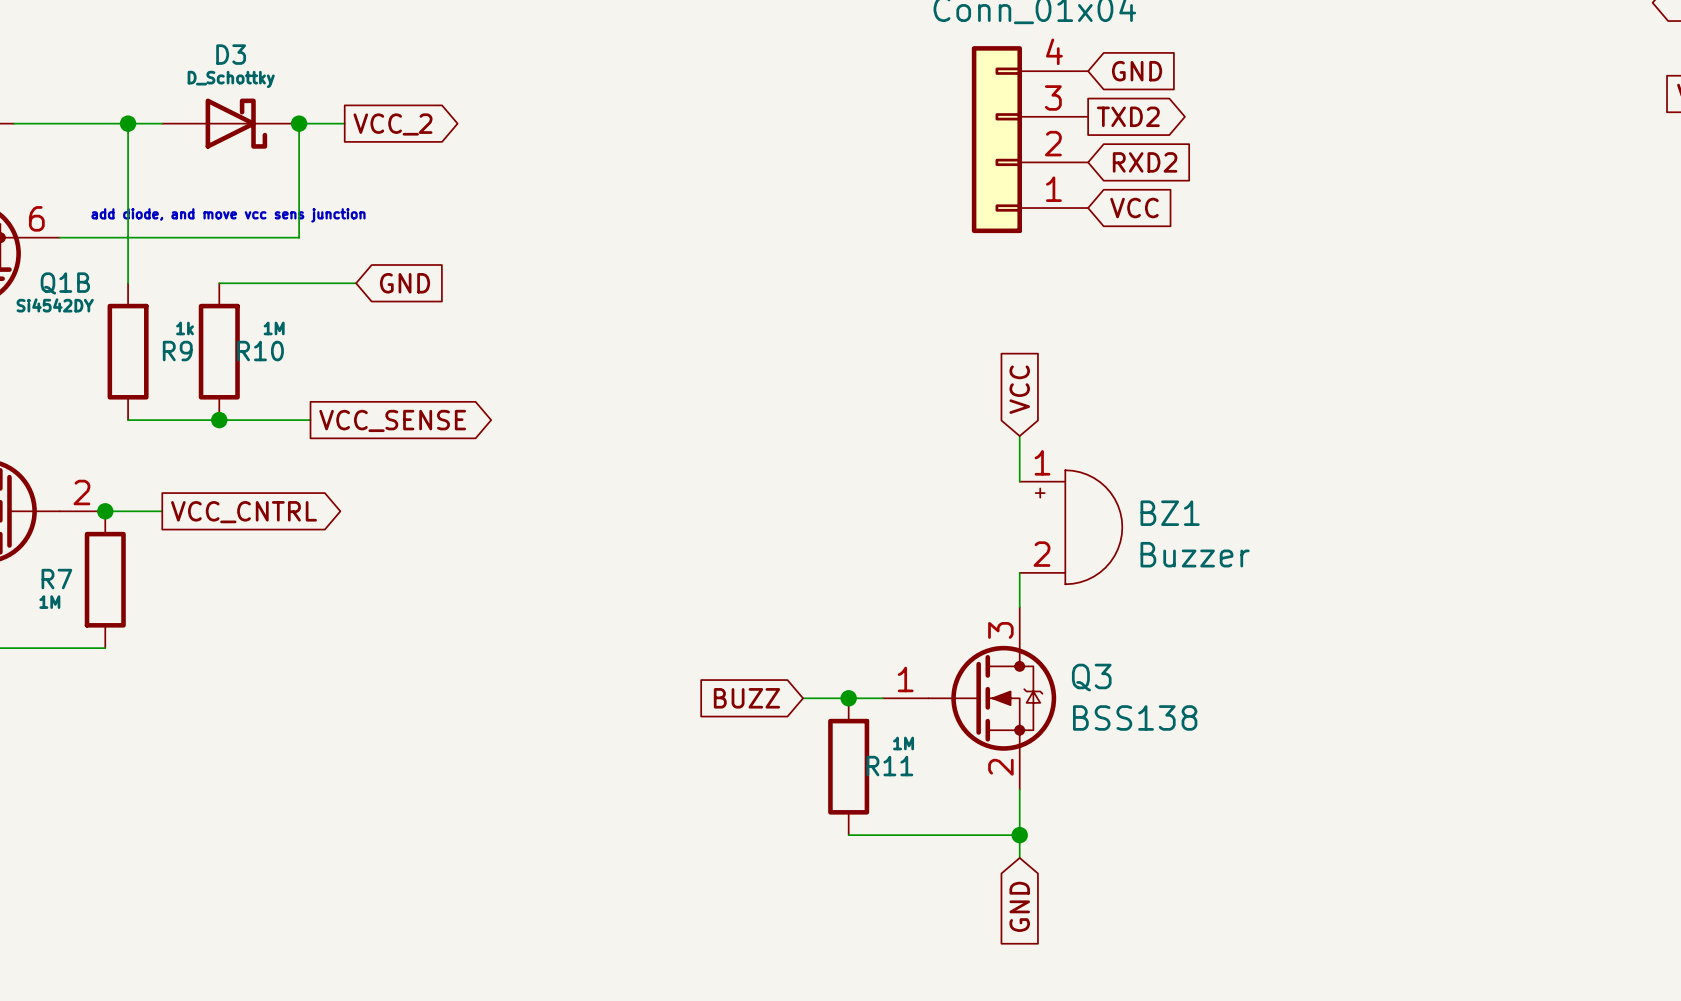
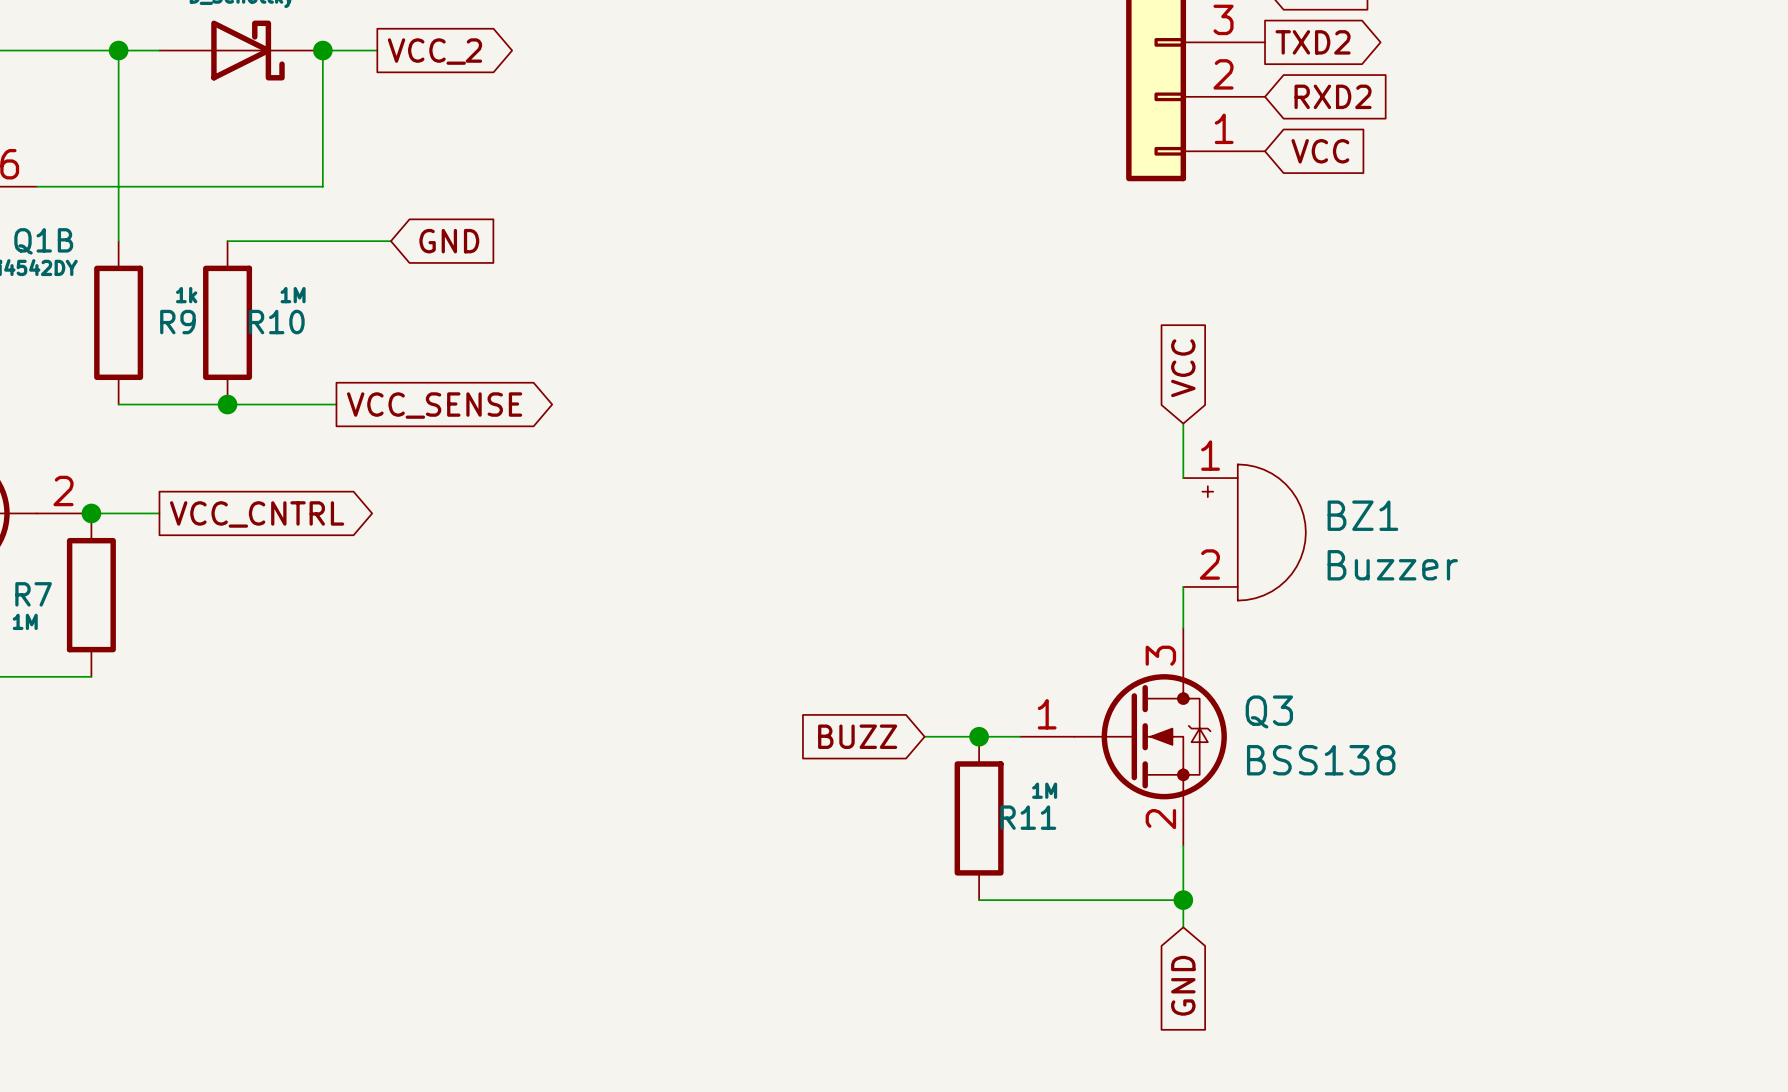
text: add diode, and move vcc sens junction (228, 215) -> none

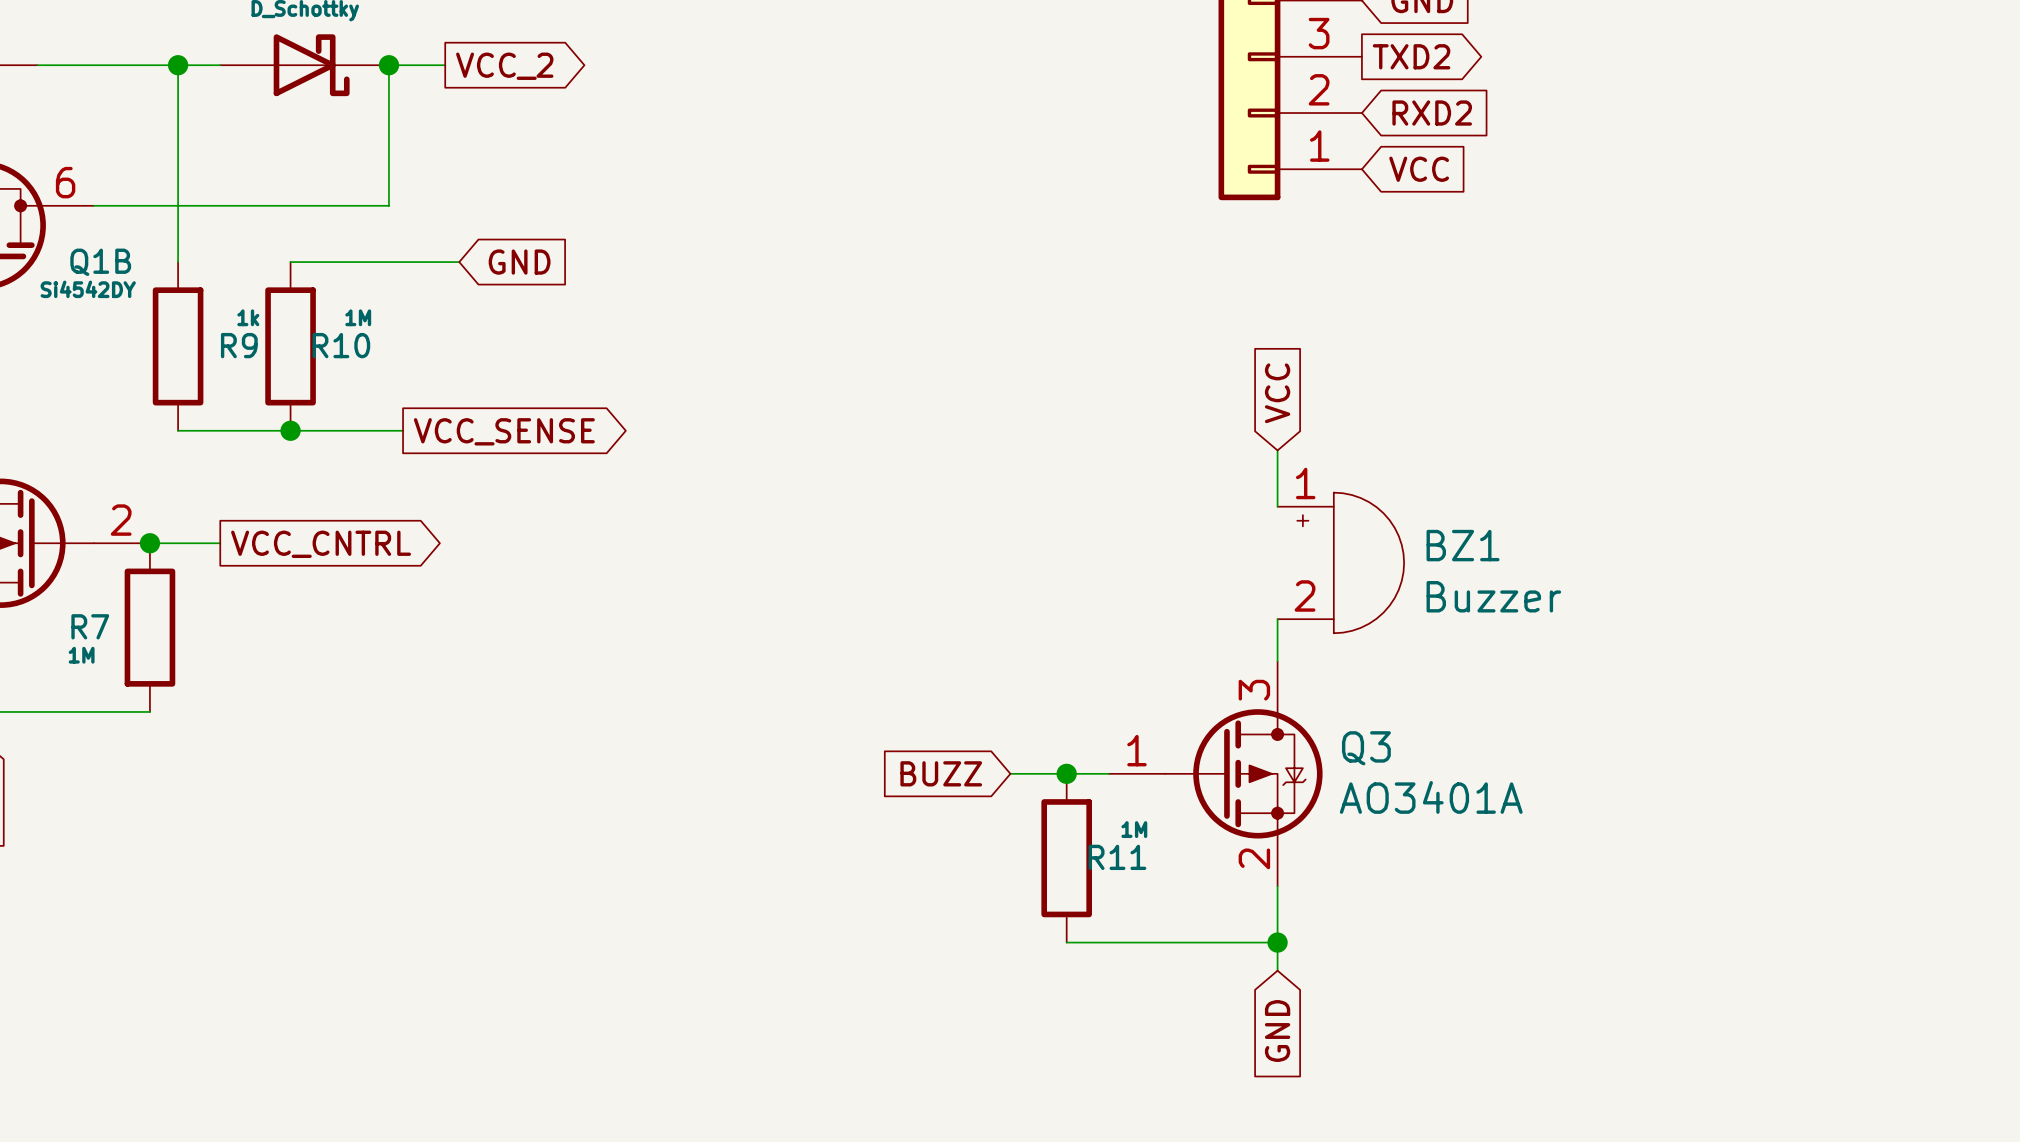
Q3 symbol: [1019, 627, 1227, 846] -> [1108, 661, 1323, 887]
Q3 value: BSS138 (1321, 760) -> AO3401A (1431, 797)

